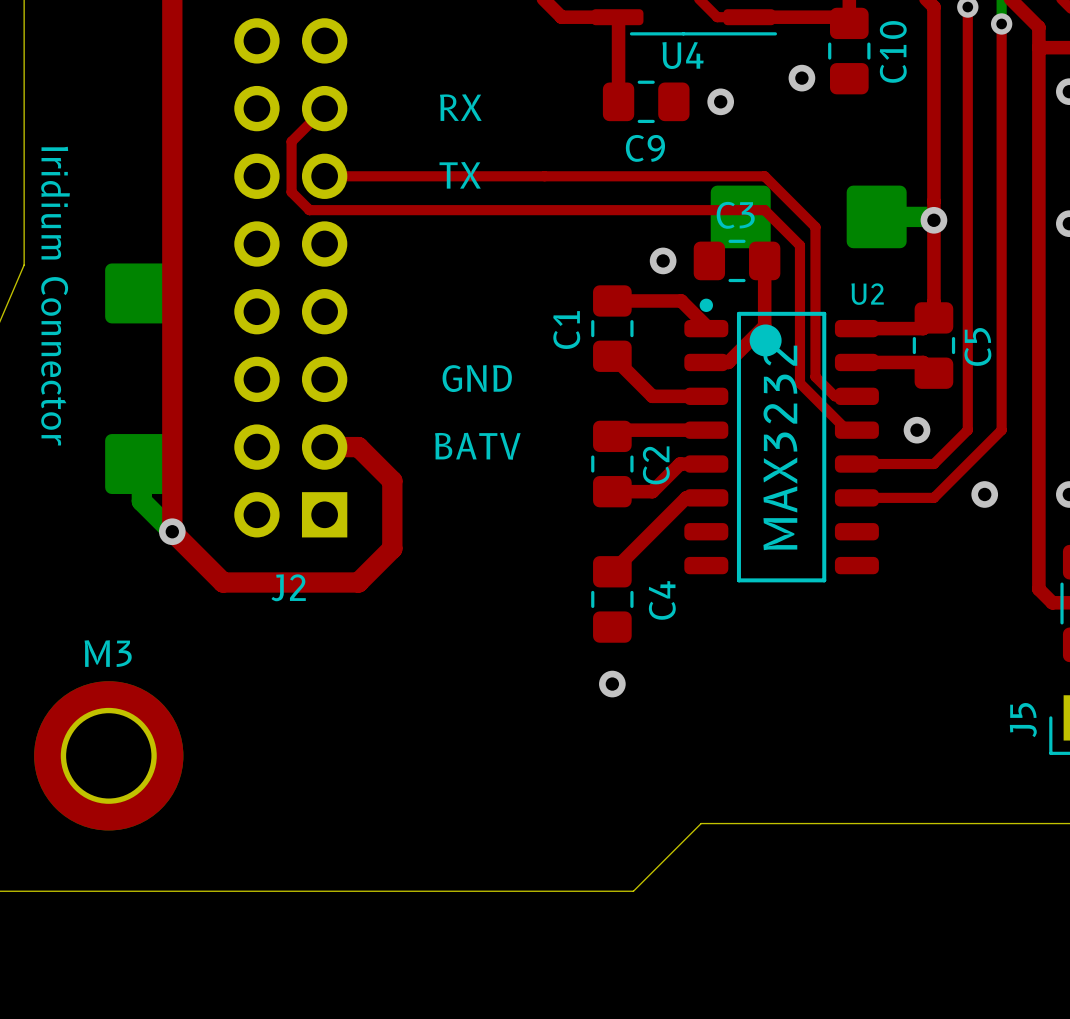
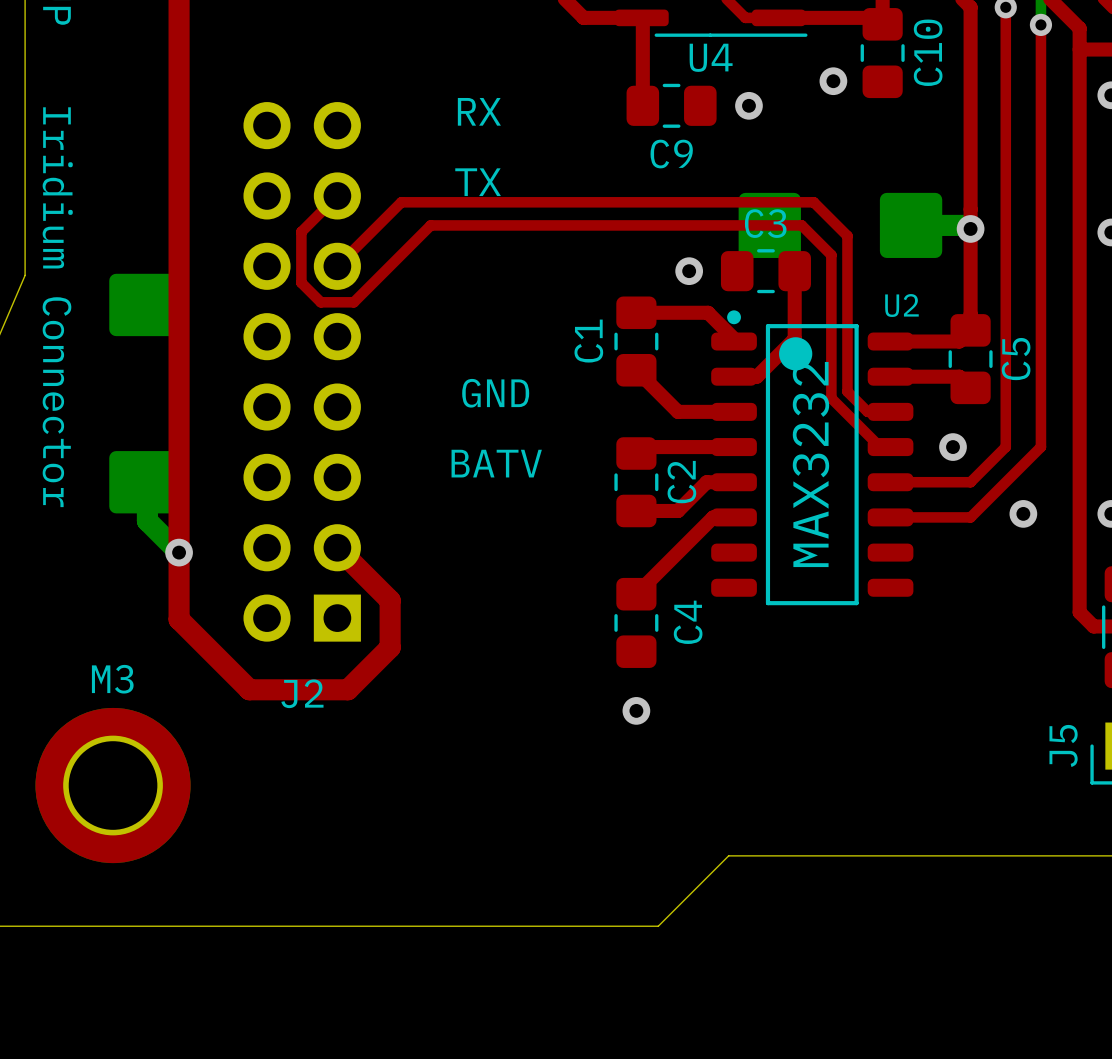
top track: (324, 108) (291, 141) (291, 192) (309, 210) (764, 210) (771, 216) -> (337, 195) (301, 231) (301, 282) (320, 302) (353, 302) (430, 225) (801, 225)
top track: (324, 176) (764, 176) (783, 194) -> (337, 266) (401, 202) (813, 202)
J2 position: (290, 277) -> (302, 371)
top track: (324, 447) (358, 447) (392, 480) (392, 548) (358, 582) (223, 582) (172, 531) -> (337, 547) (390, 600) (390, 647) (347, 689) (249, 689) (179, 619) (179, 552)

